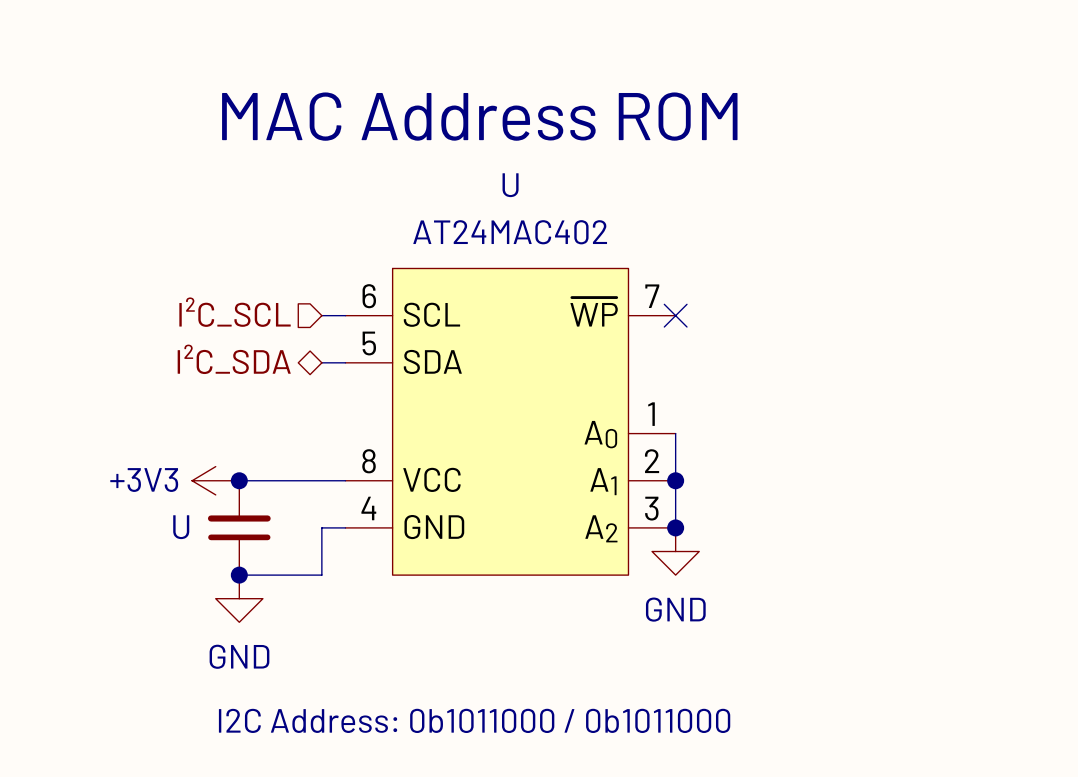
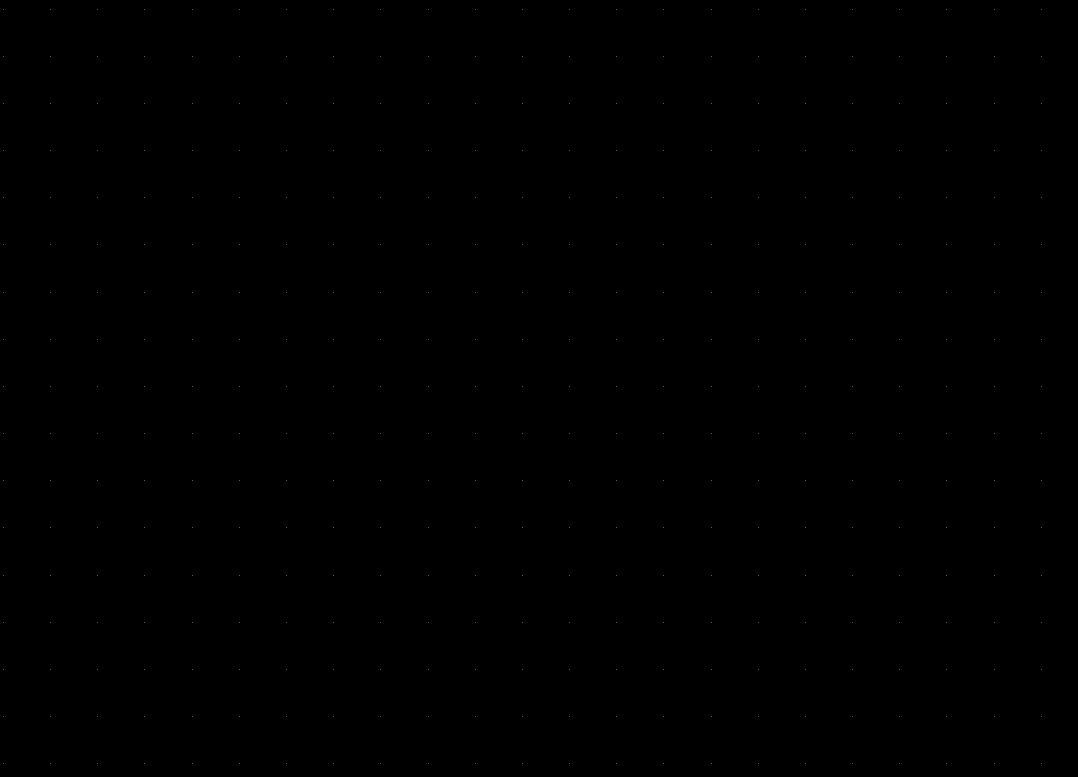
text: MAC Address ROM (479, 116) -> none
hierarchical label: I²C_SCL (235, 312) -> none
wire: (321, 315) (345, 315) -> none
no-connect mark: (675, 315) -> none
hierarchical label: I²C_SDA (234, 359) -> none
wire: (321, 362) (345, 362) -> none
U: AT24MAC402 (510, 421) -> none
wire: (675, 433) (675, 527) -> none
power symbol: +3V3 (215, 480) -> none
wire: (239, 480) (345, 480) -> none
junction: (239, 480) -> none
junction: (675, 480) -> none
U: (239, 527) -> none
wire: (345, 527) (321, 527) (321, 575) (239, 575) -> none
junction: (675, 527) -> none
power symbol: GND (675, 551) -> none
junction: (239, 575) -> none
power symbol: GND (239, 598) -> none
text: I2C Address: 0b1011000 / 0b1011000 (474, 720) -> none

